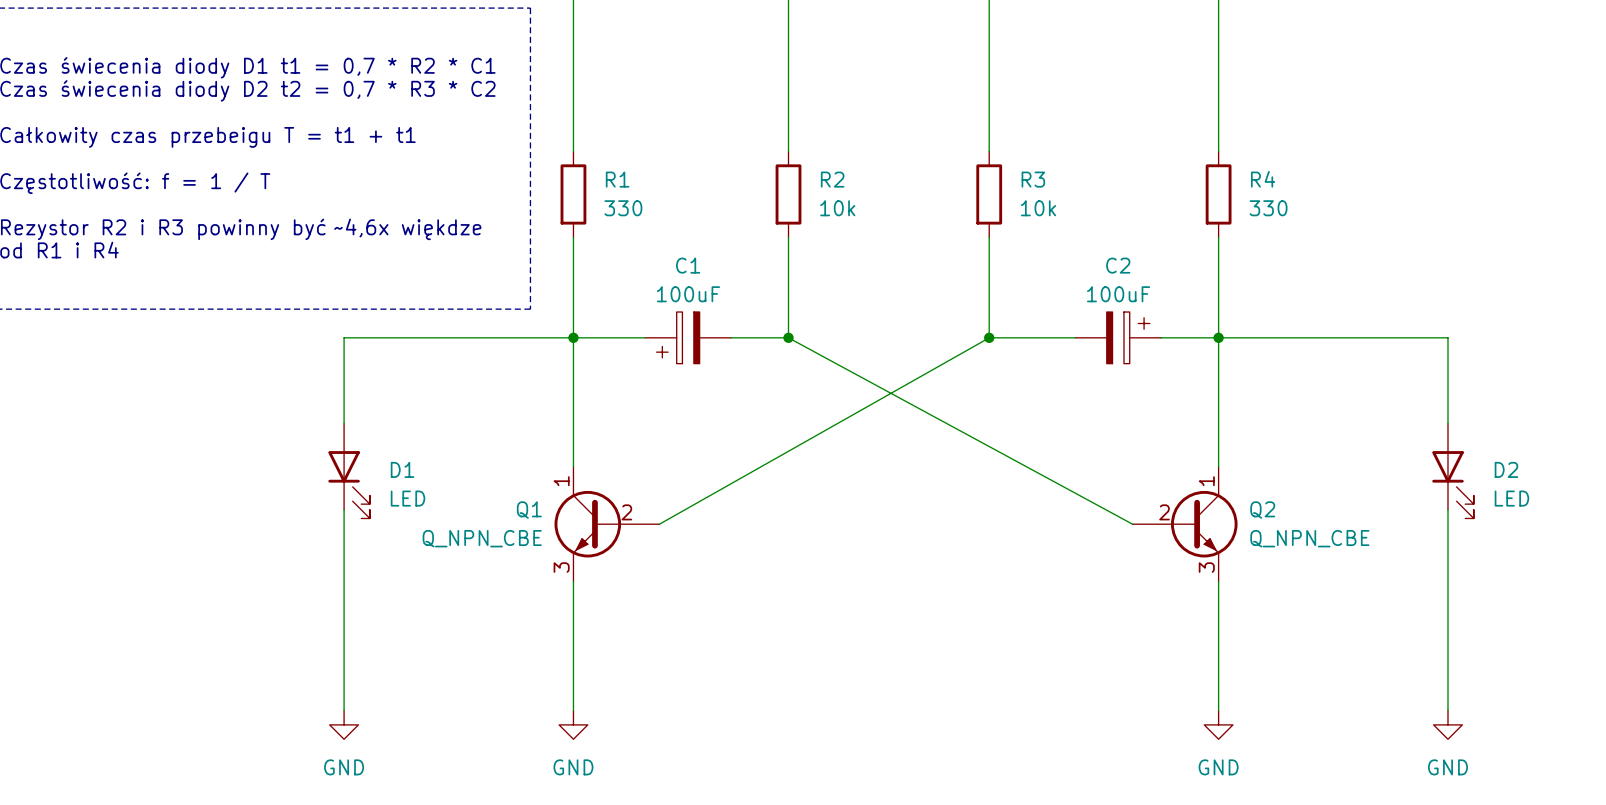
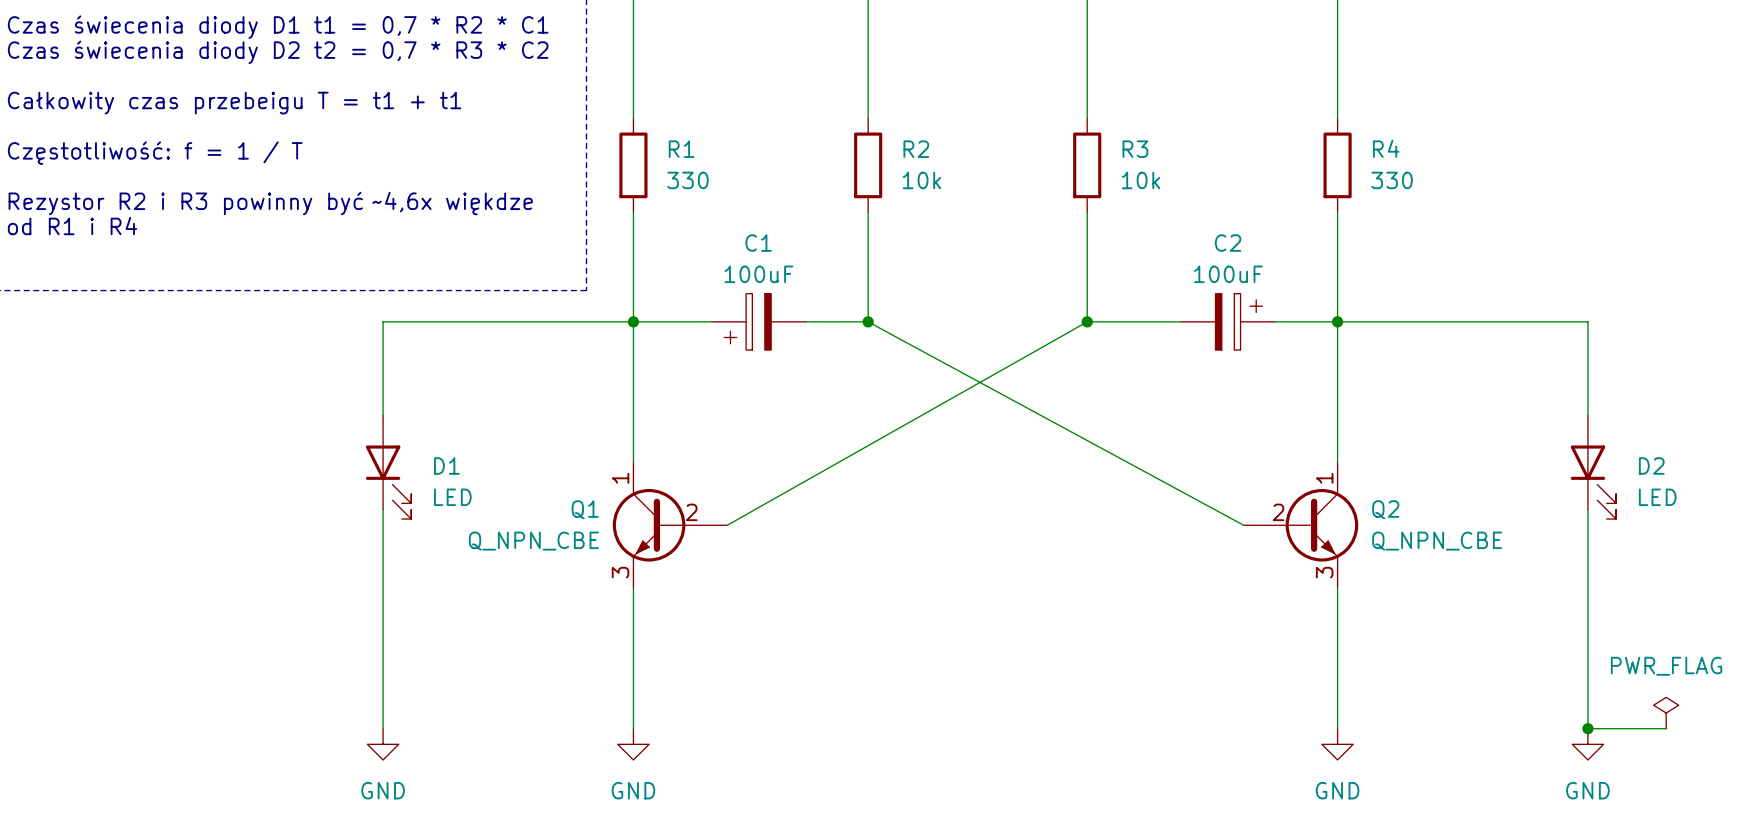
power symbol: none -> PWR_FLAG (1666, 713)
wire: none -> (1587, 728) (1666, 728)
junction: none -> (1587, 728)

